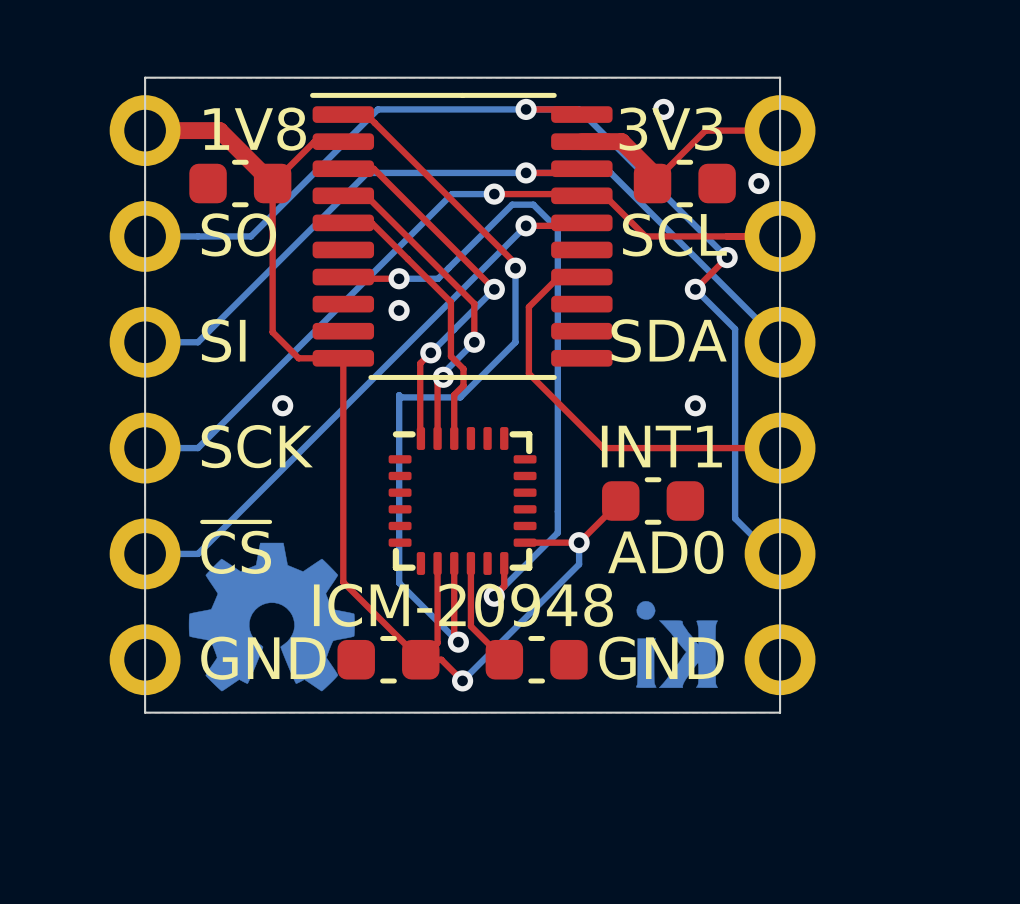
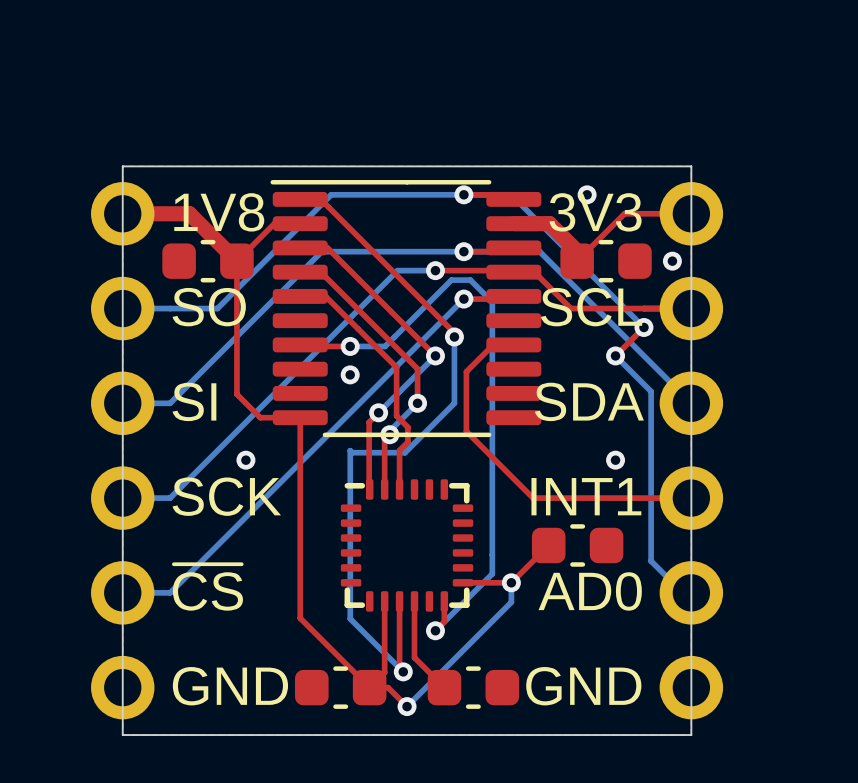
drawing: [188, 542, 355, 692] -> none
drawing: [635, 601, 718, 688] -> none
part value: ICM-20948 (463, 605) -> none

